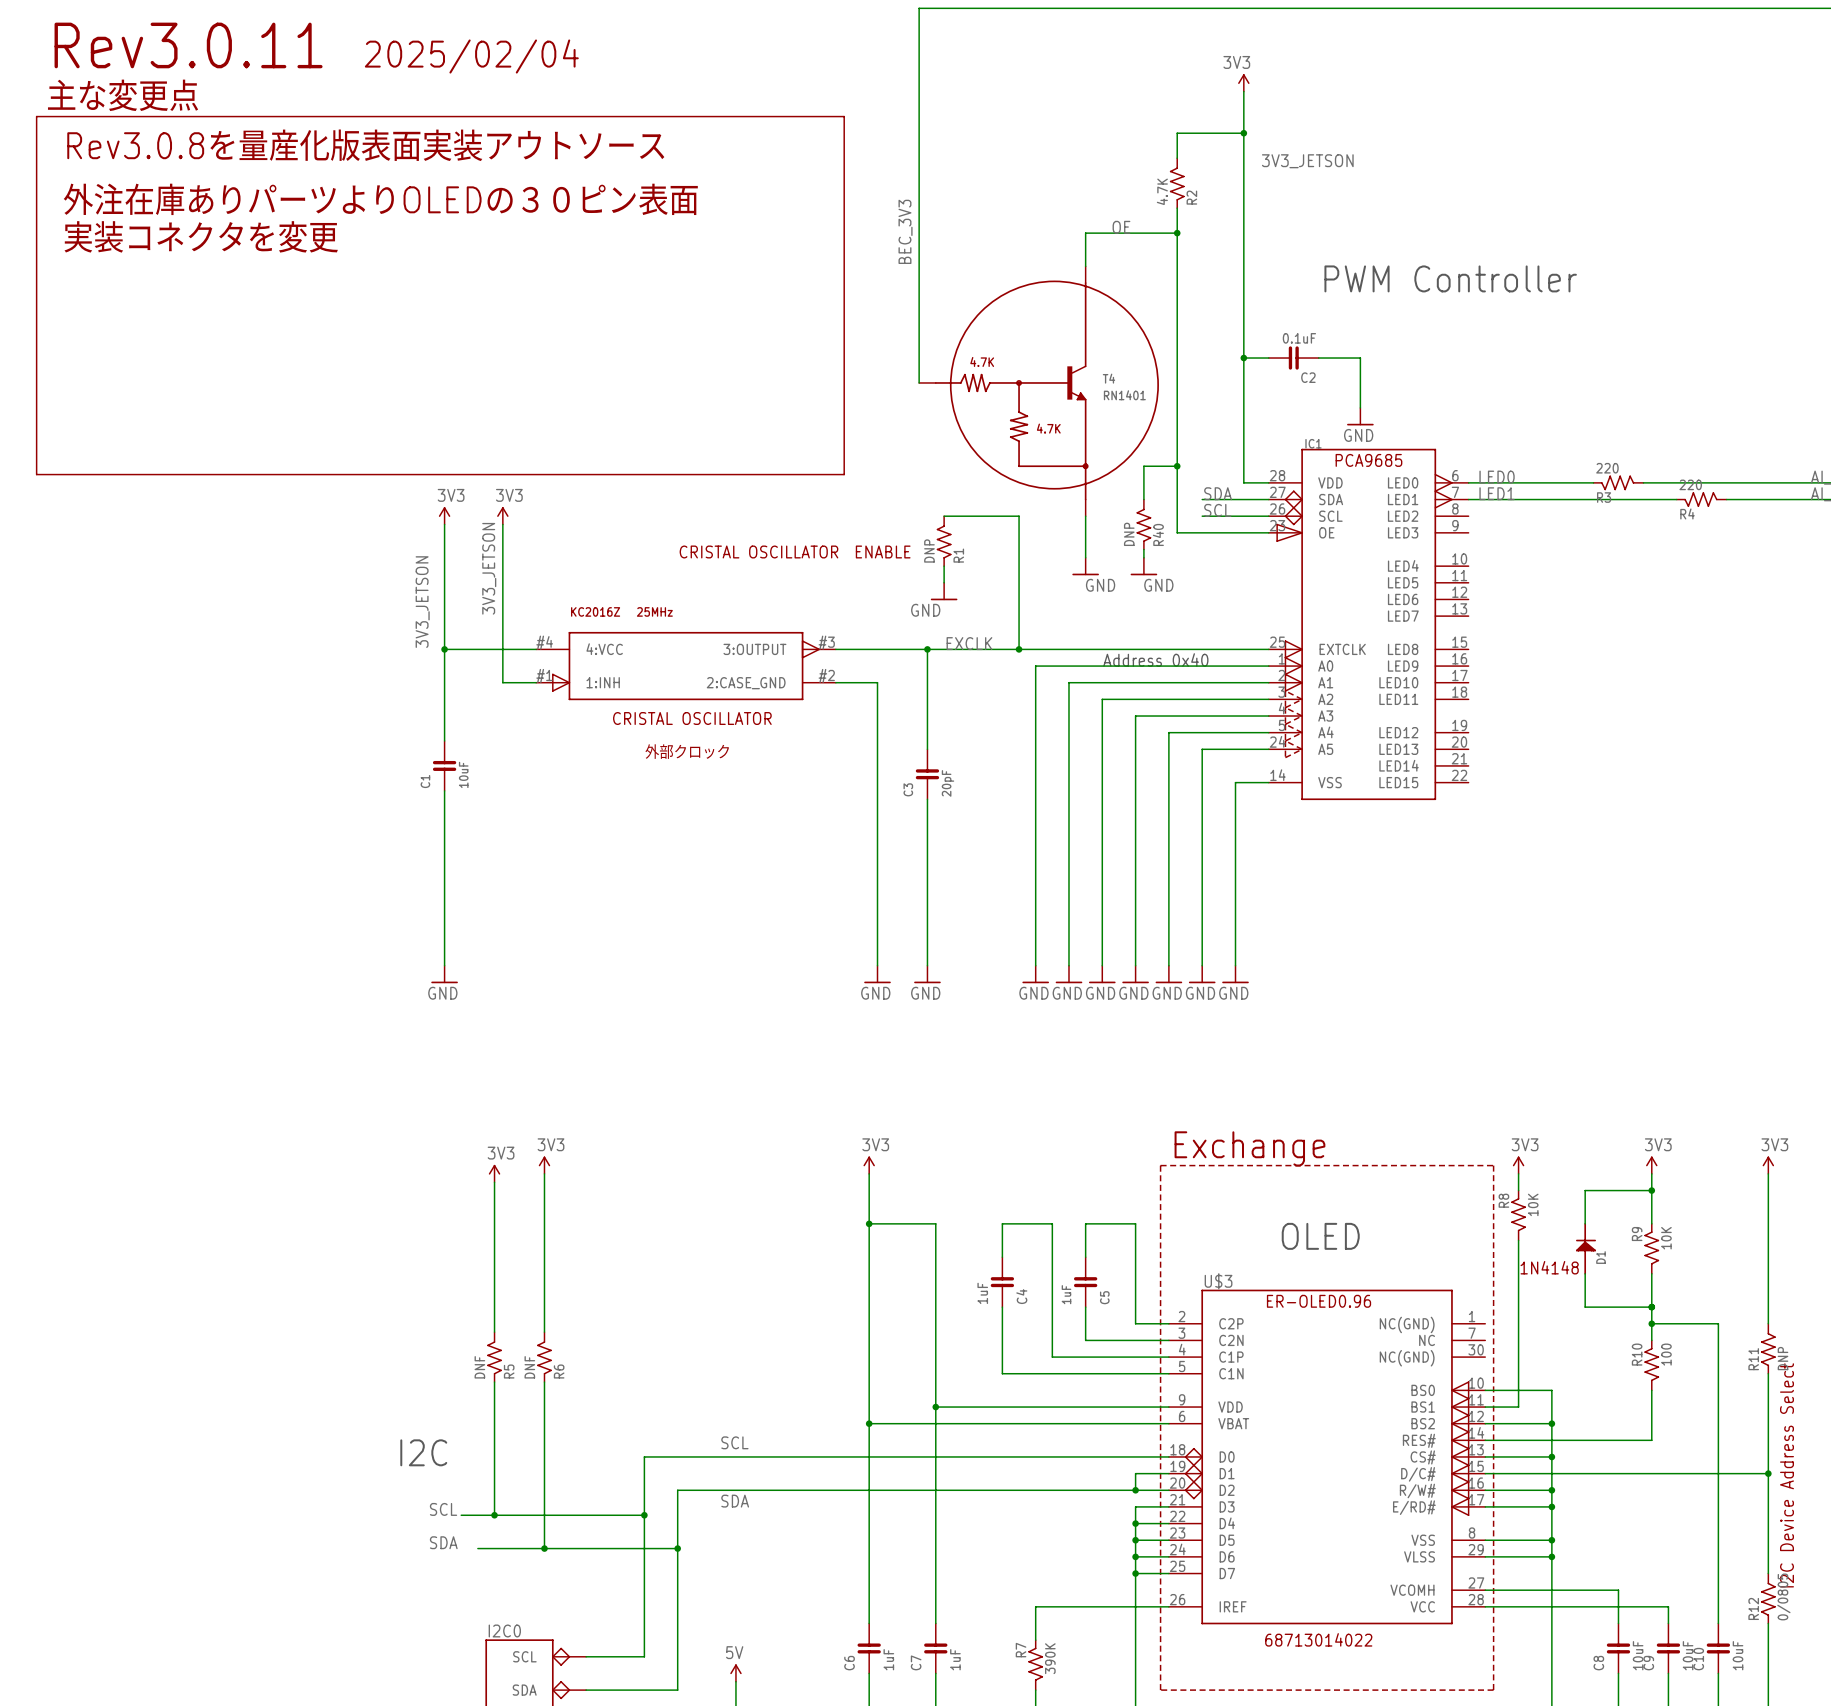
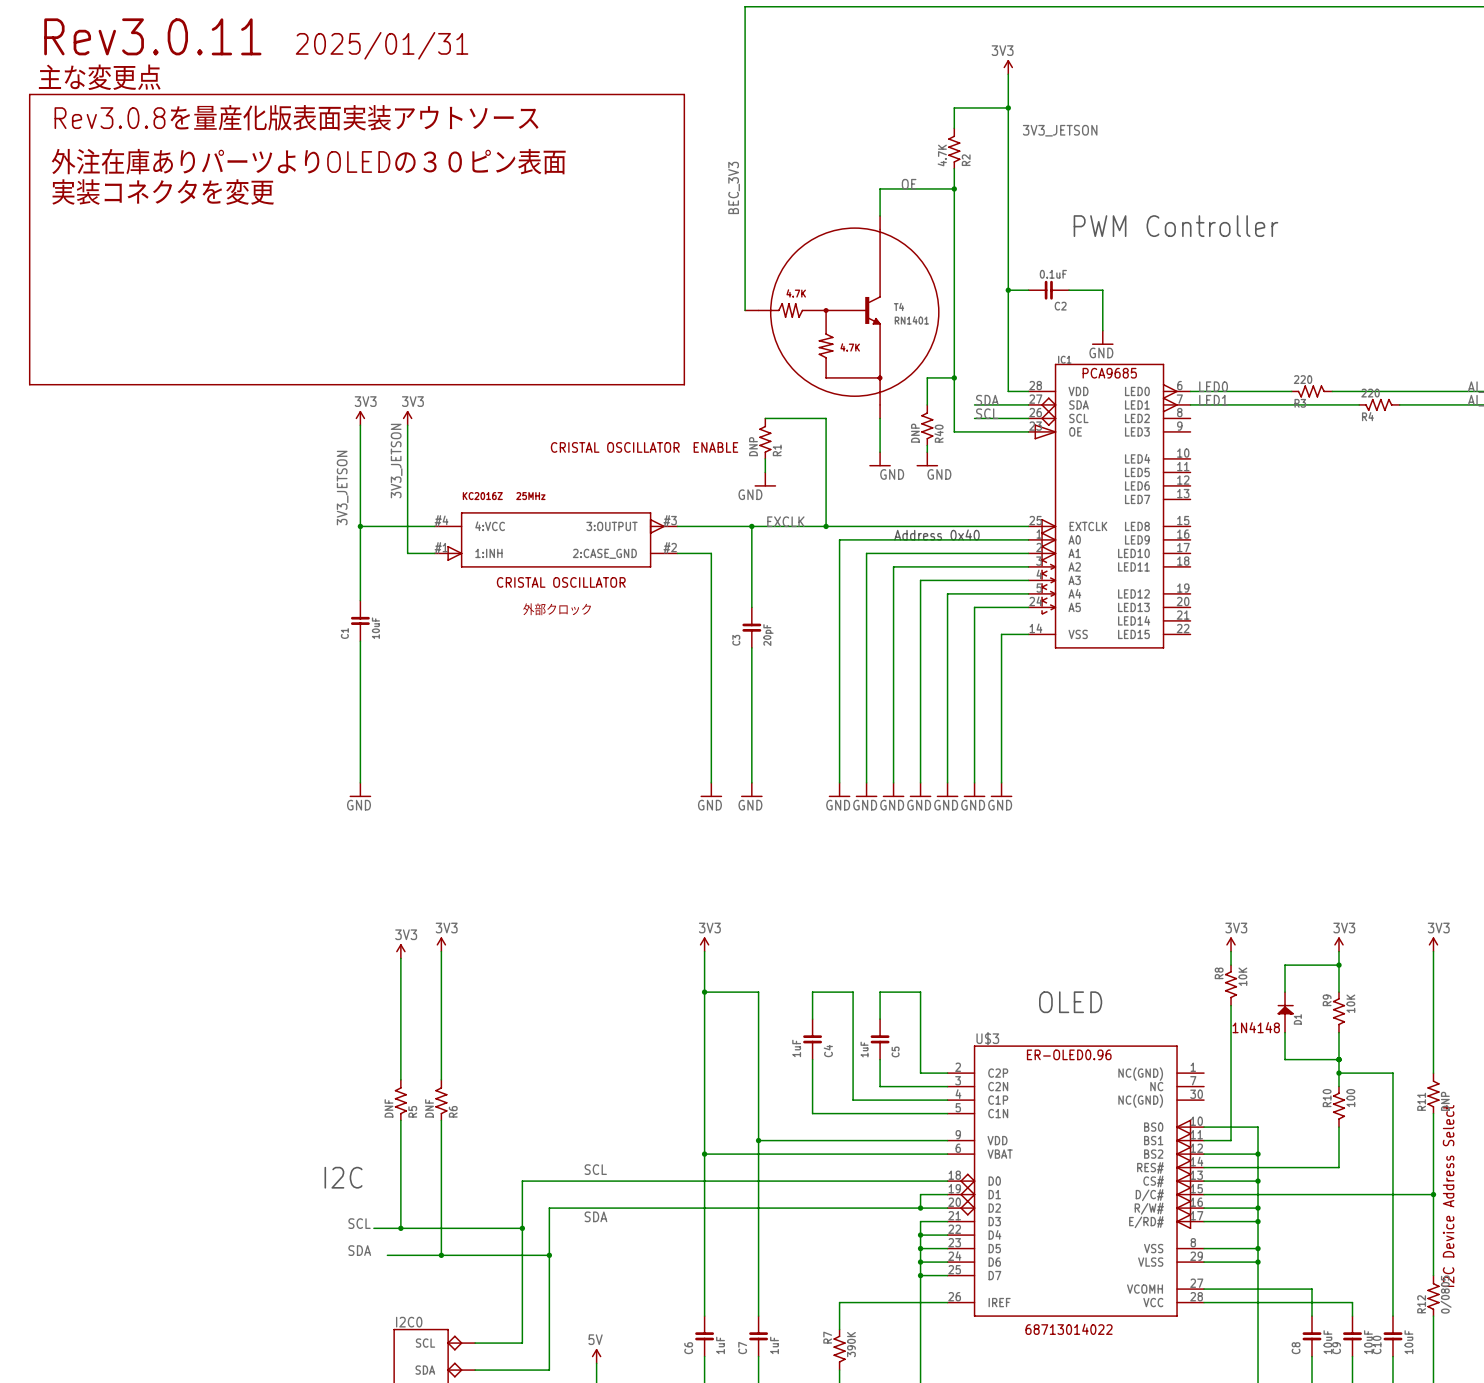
text: 2025/02/04 (471, 56) -> 2025/01/31 (382, 45)
text: Exchange (1249, 1148) -> none
line: (1160, 1165) (1160, 1690) (1493, 1690) (1493, 1165) (1160, 1165) -> none

